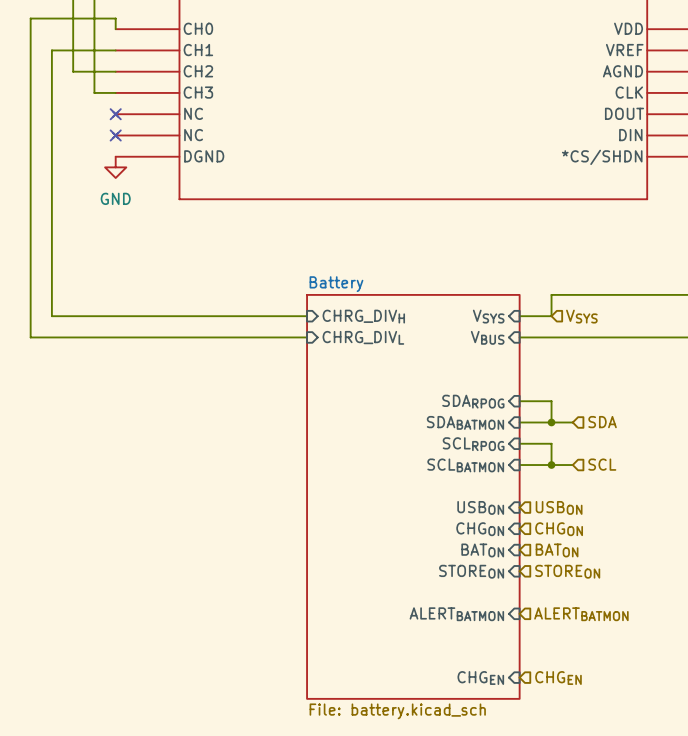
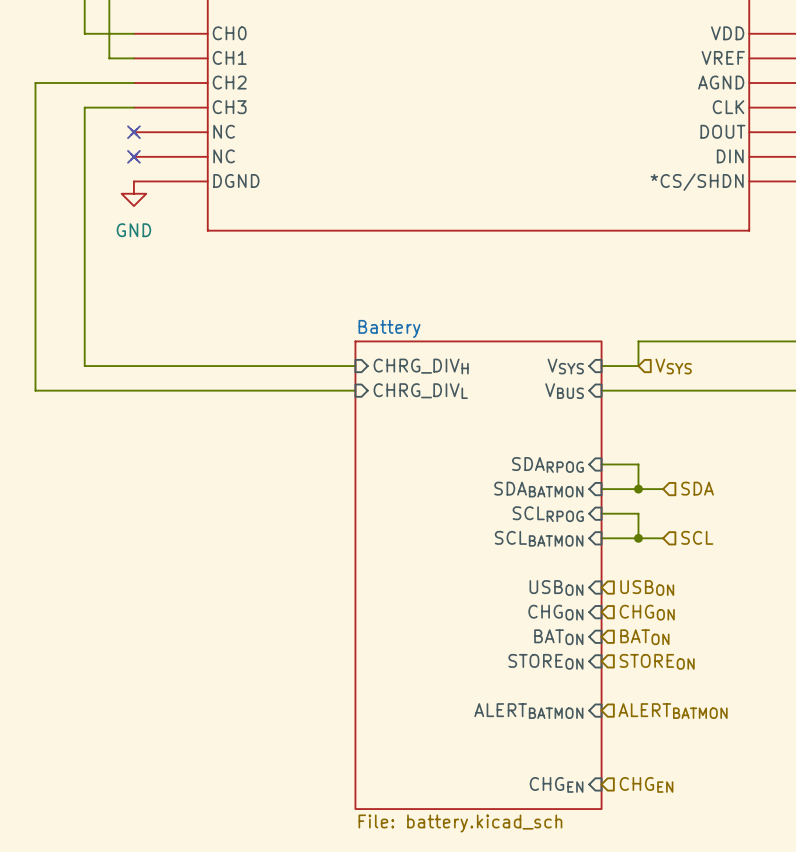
wire: (73, 29) (73, 71) -> (84, 33) (133, 33)
wire: (115, 29) (115, 18) (30, 18) (30, 71) -> (84, 83) (35, 83)
wire: (94, 92) (94, 50) (51, 50) (51, 316) (73, 316) -> (109, 107) (84, 107) (84, 366)

